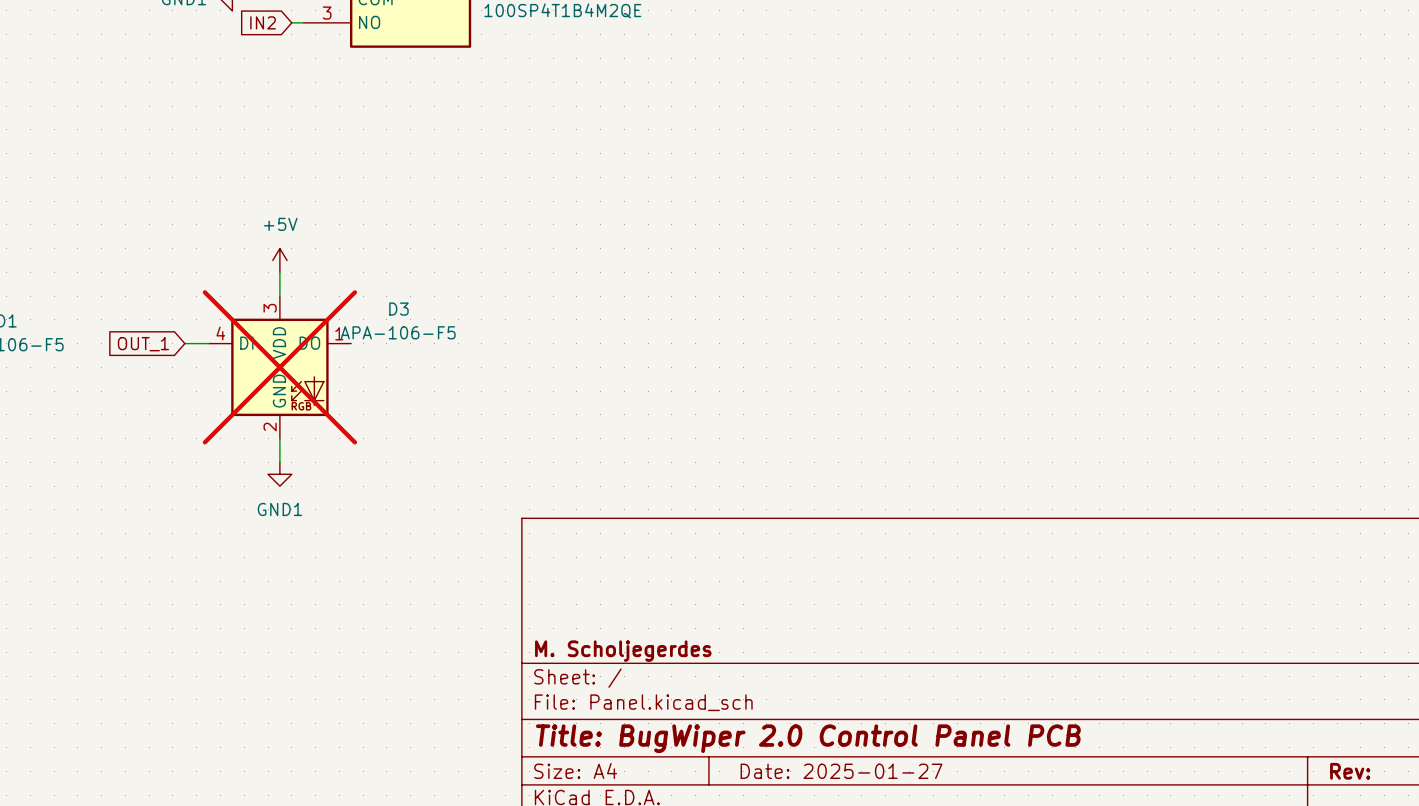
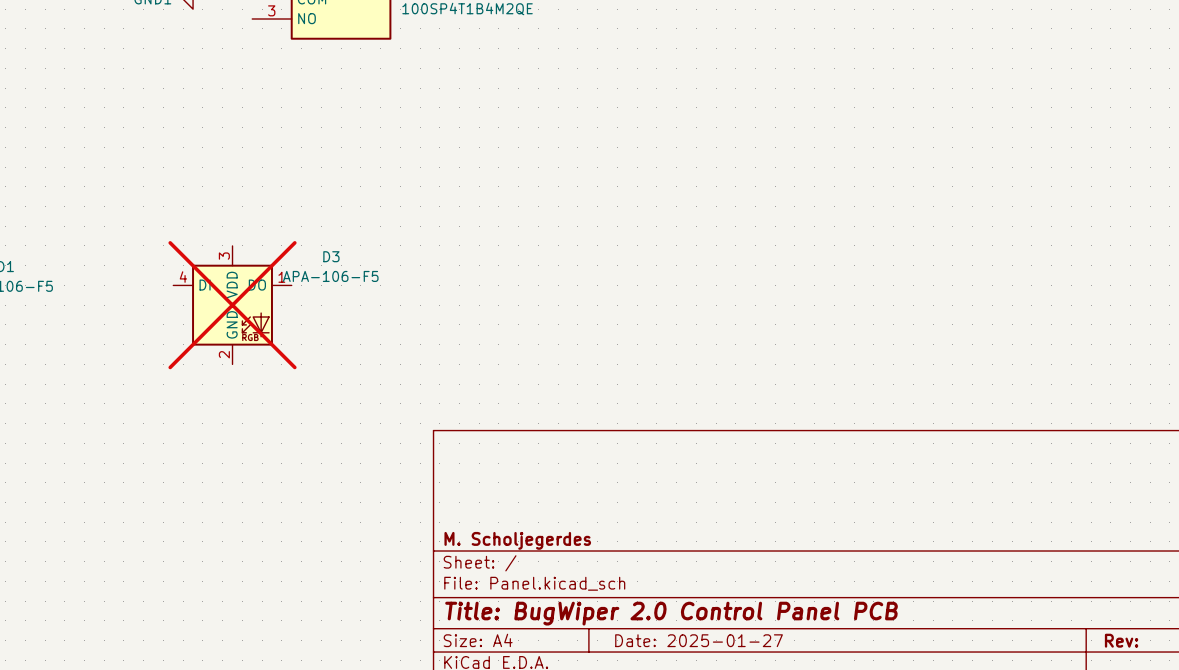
global label: IN2 (263, 22) -> none
wire: (291, 22) (303, 22) -> none
power symbol: +5V (279, 260) -> none
wire: (279, 272) (279, 296) -> none
wire: (184, 343) (208, 343) -> none
global label: OUT_1 (143, 344) -> none
wire: (279, 438) (279, 462) -> none
power symbol: GND1 (279, 474) -> none

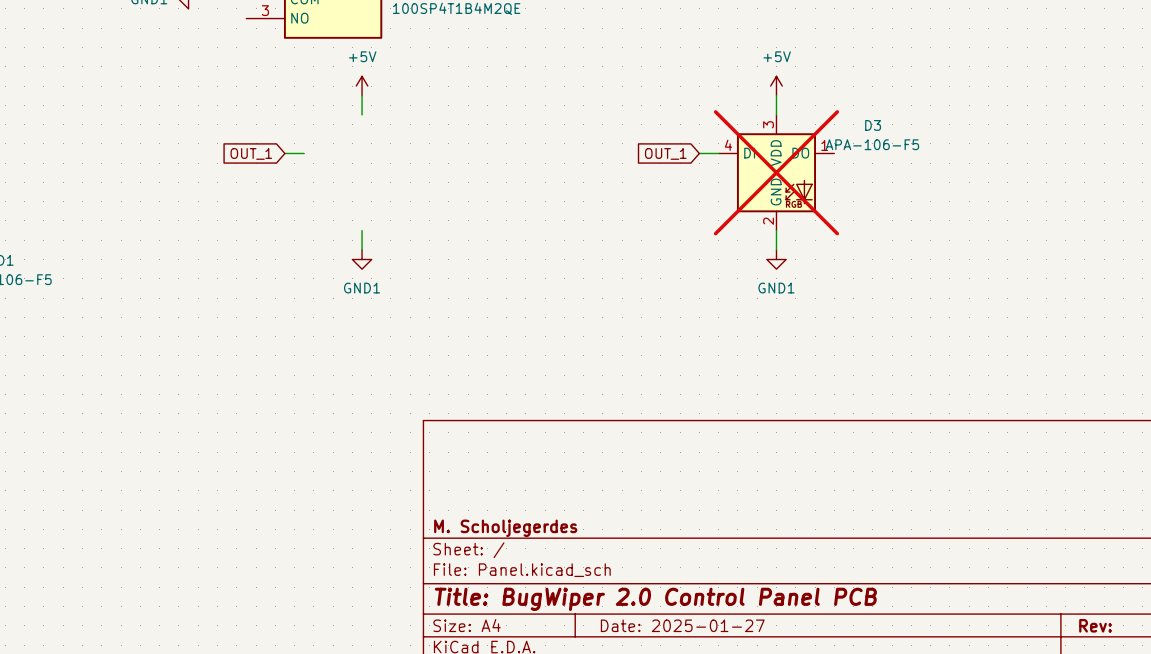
power symbol: none -> +5V (362, 86)
power symbol: none -> +5V (776, 86)
wire: none -> (362, 95) (362, 114)
wire: none -> (776, 95) (776, 114)
global label: none -> OUT_1 (251, 153)
wire: none -> (284, 153) (304, 153)
global label: none -> OUT_1 (665, 153)
wire: none -> (699, 153) (718, 153)
wire: none -> (362, 230) (362, 249)
wire: none -> (776, 230) (776, 249)
power symbol: none -> GND1 (362, 259)
power symbol: none -> GND1 (776, 259)
D3 position: (232, 305) -> (776, 172)

